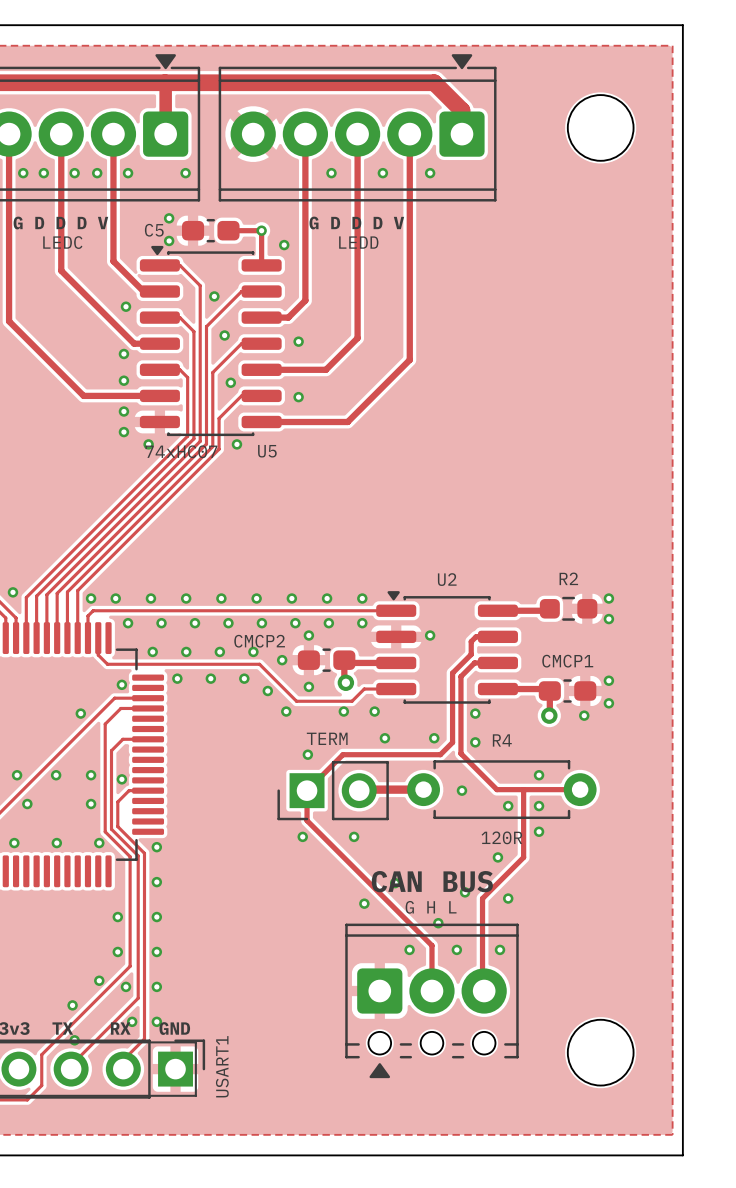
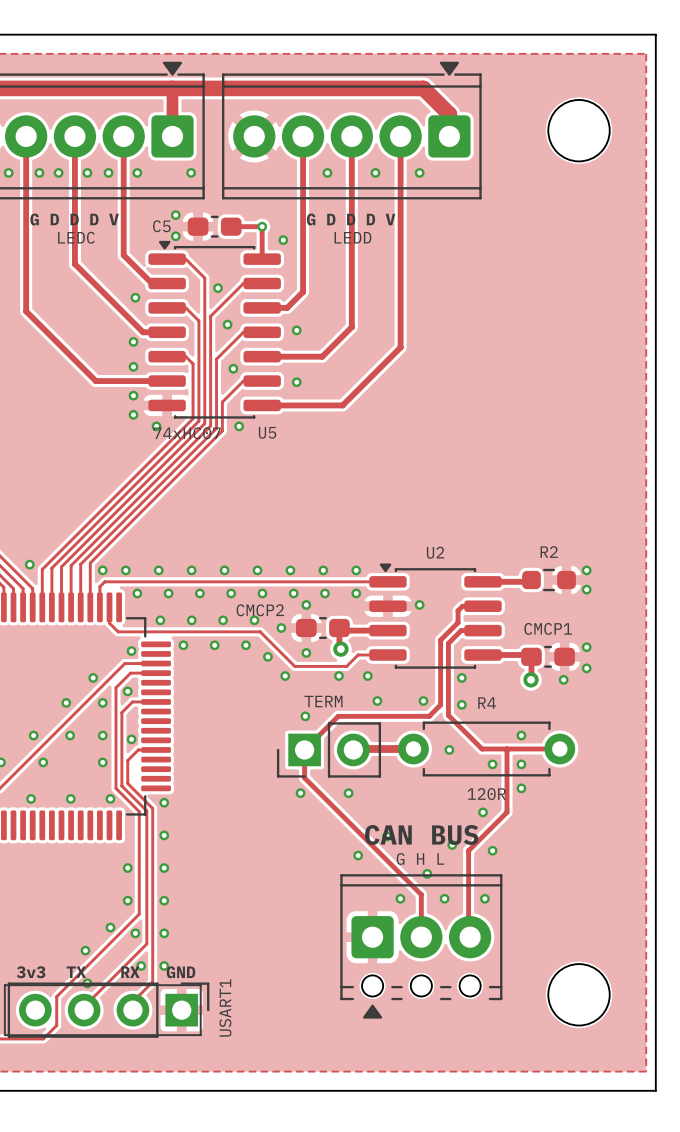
via: none -> (127, 691)
via: none -> (66, 702)
via: none -> (102, 702)

